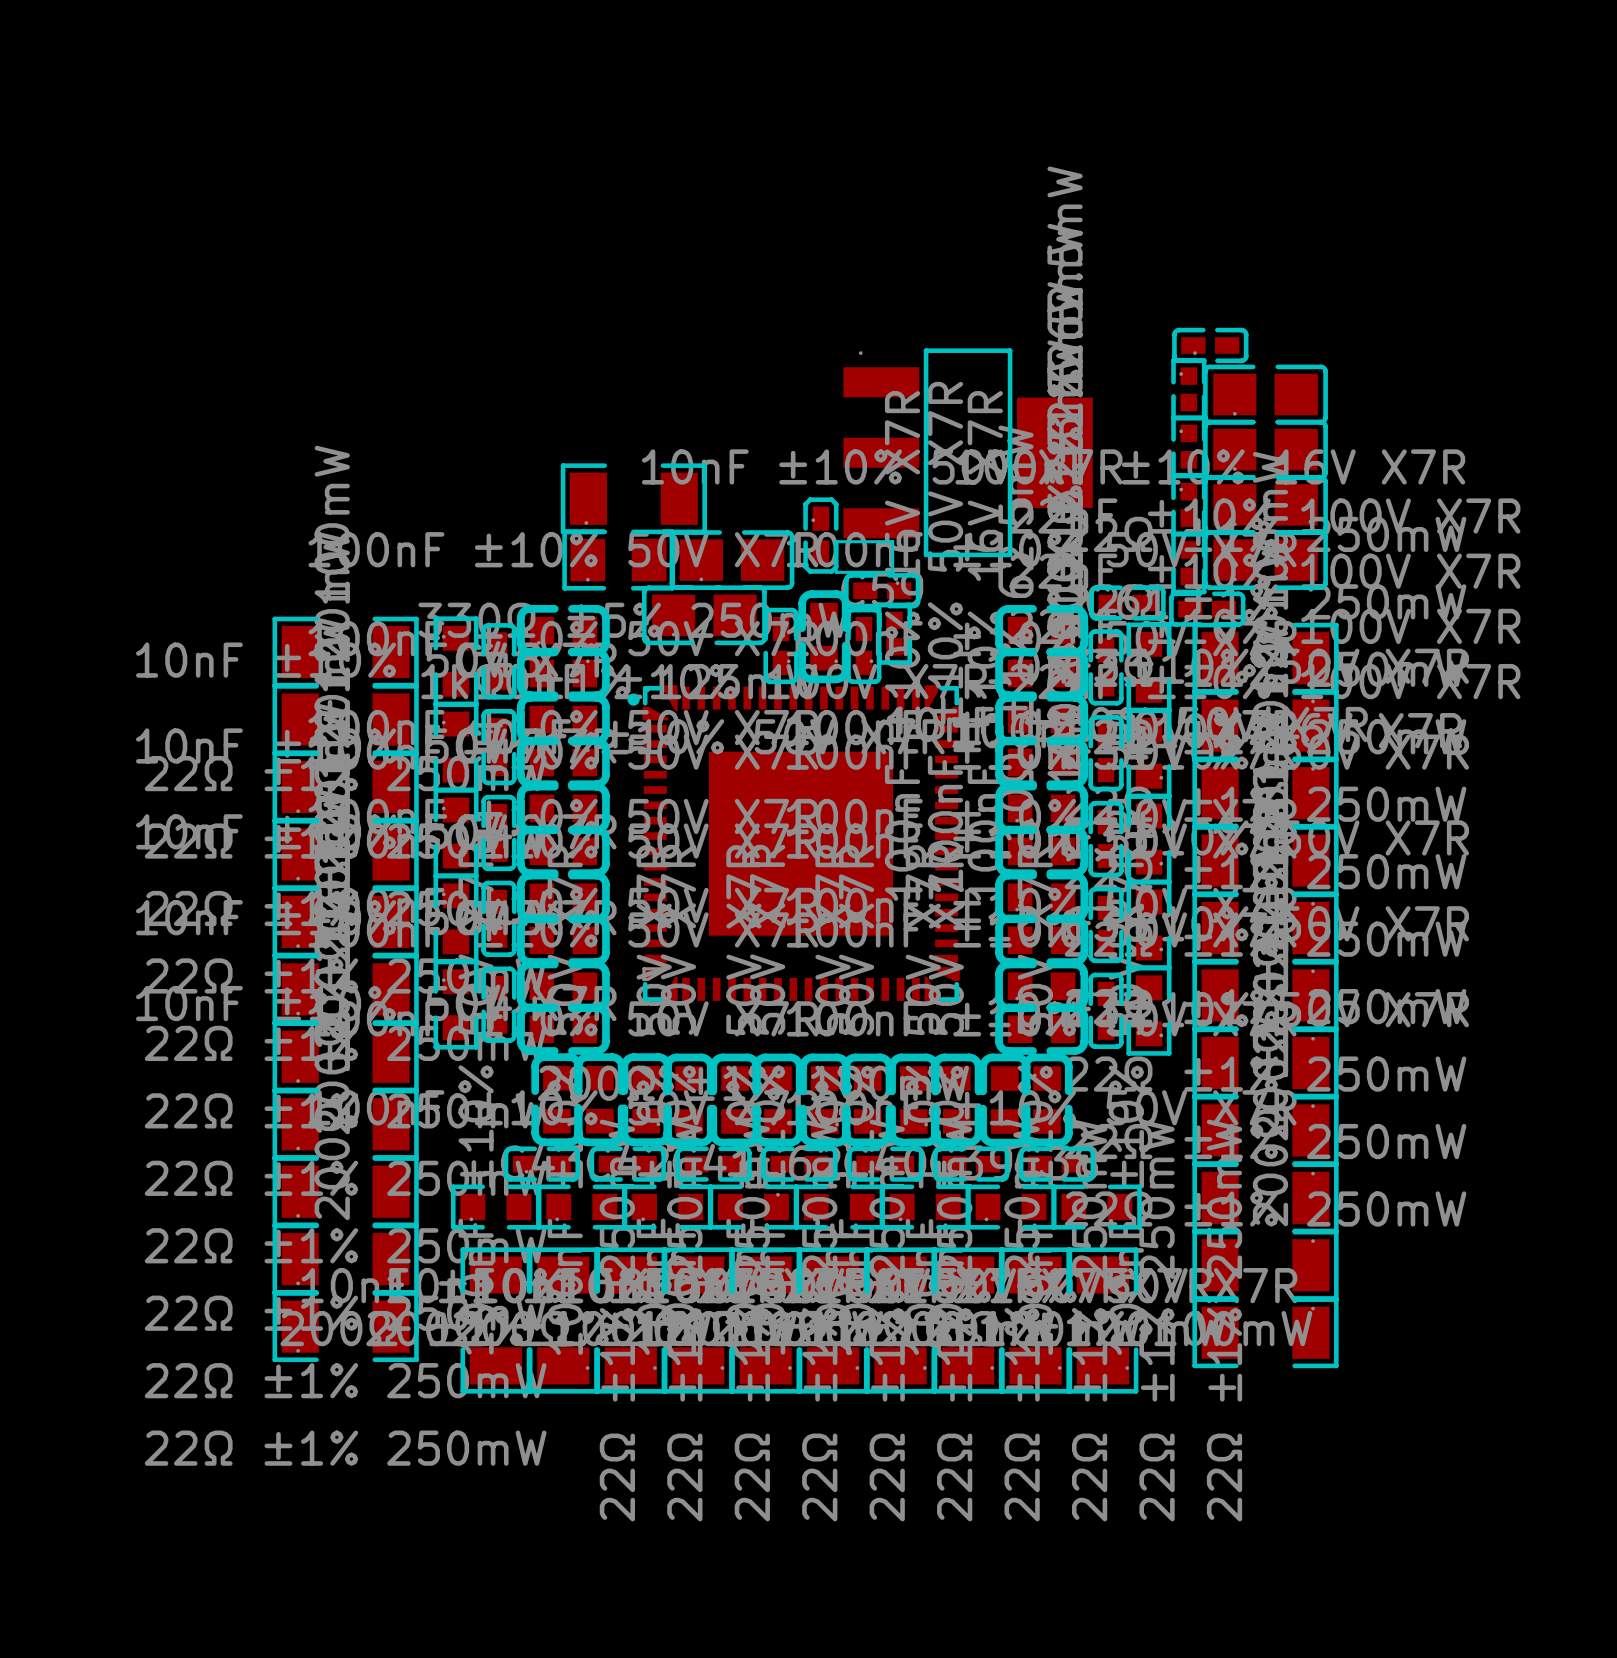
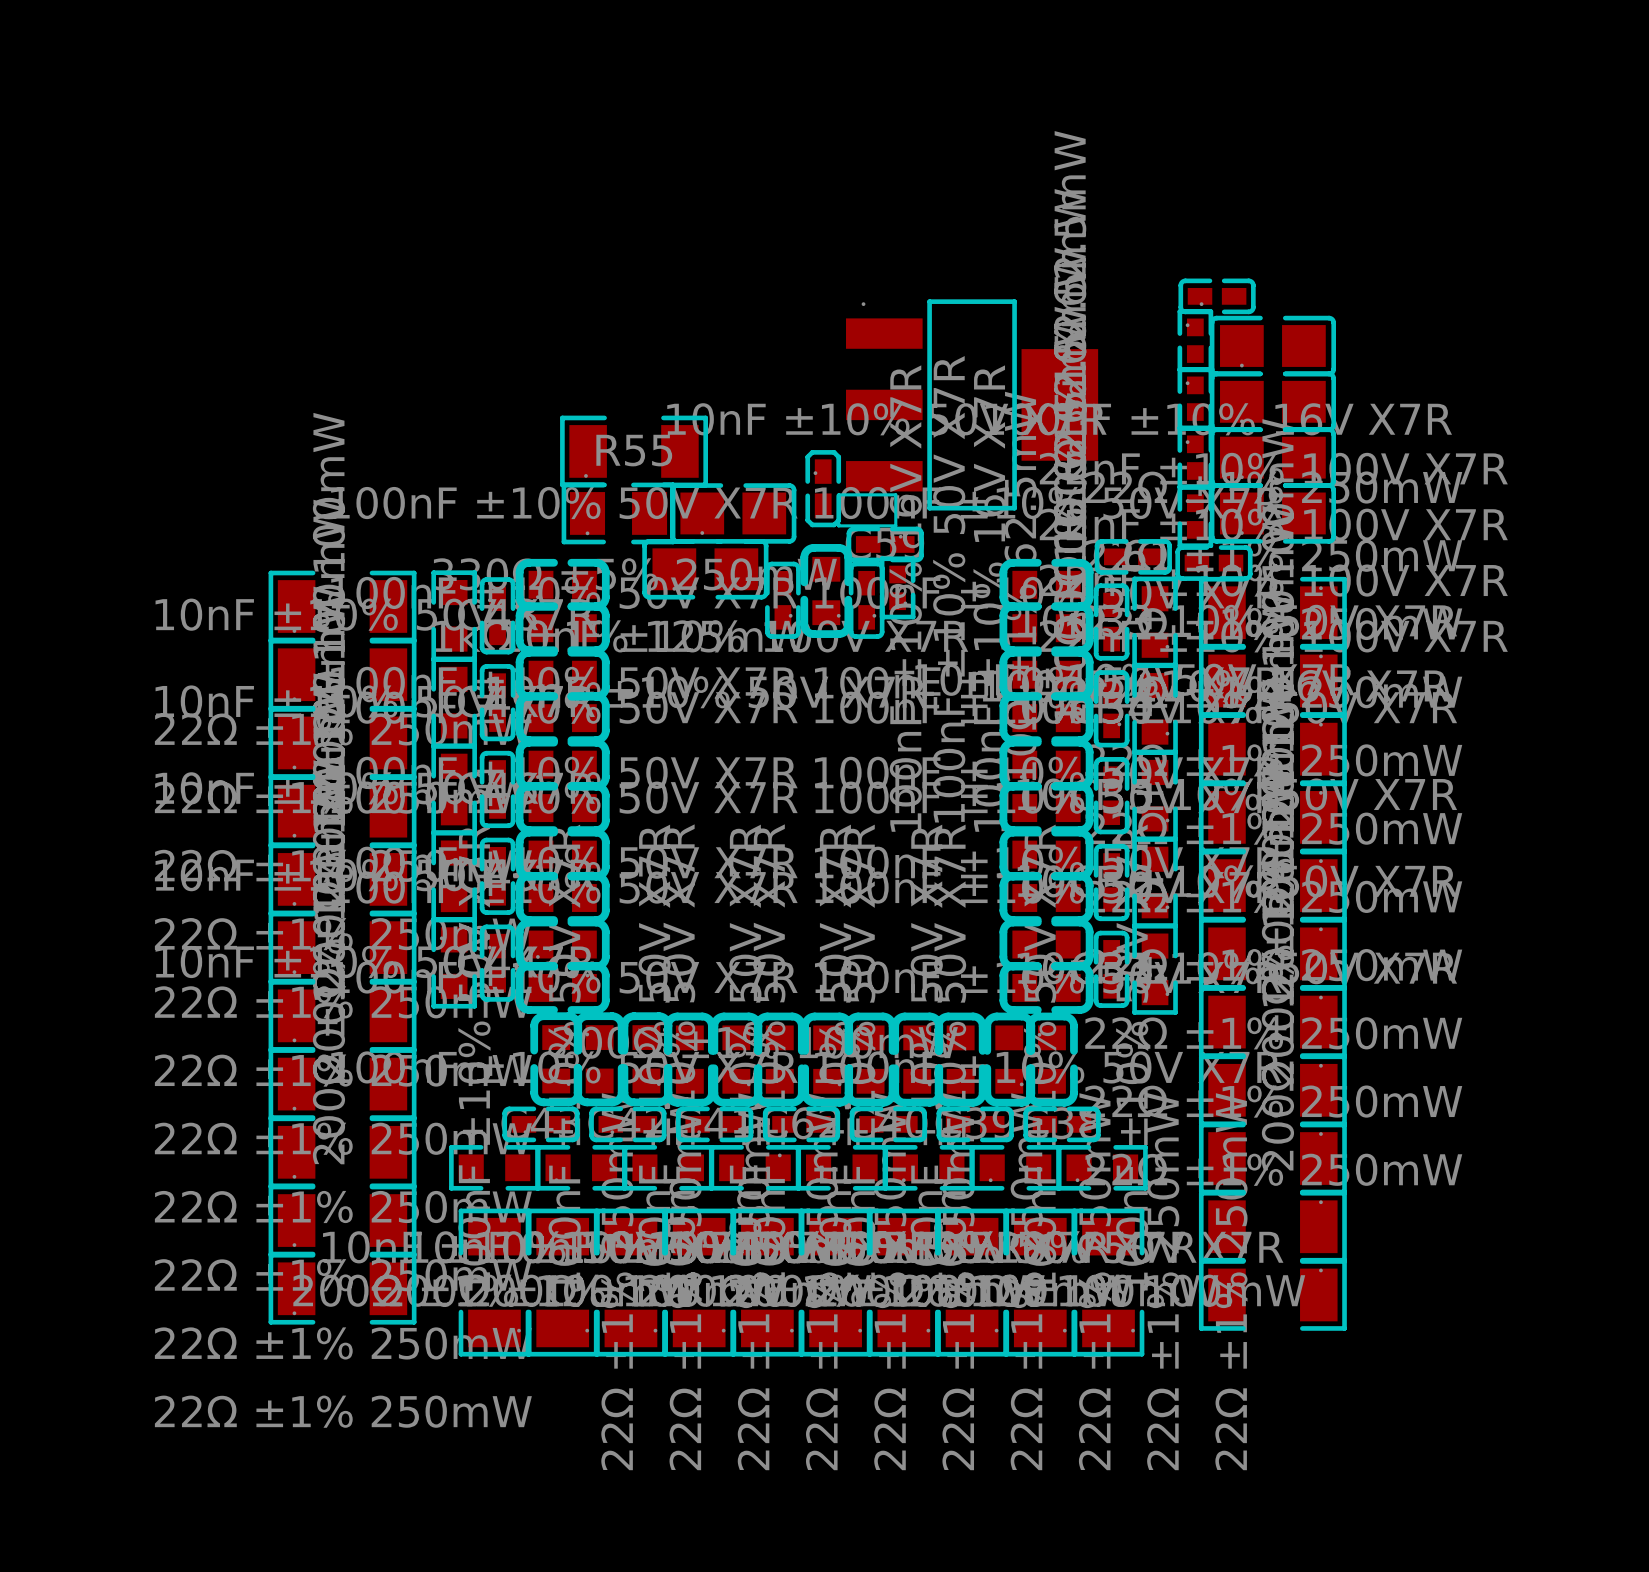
R55 name: none -> R55 (634, 450)
part: (793, 843) -> none

